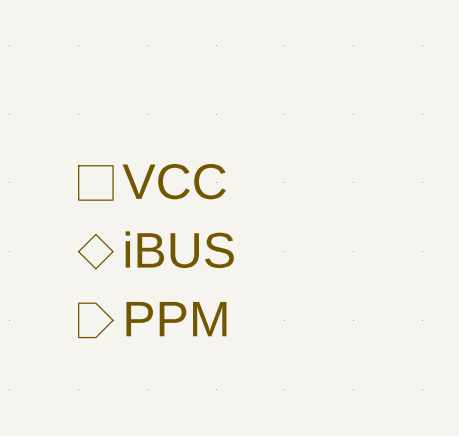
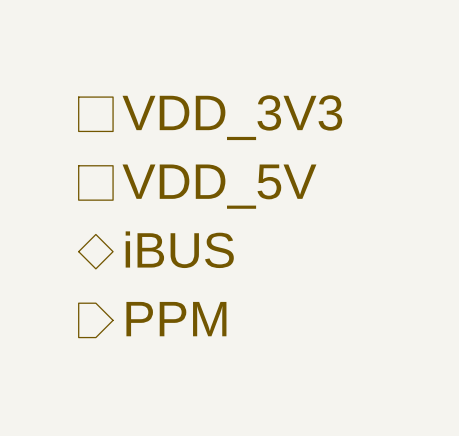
hierarchical label: none -> VDD_3V3 (232, 117)
hierarchical label: VCC (174, 181) -> VDD_5V (219, 186)

